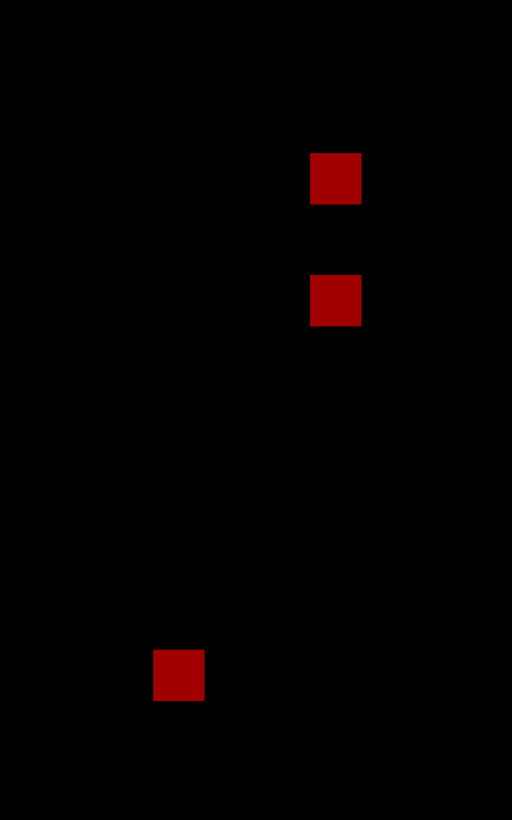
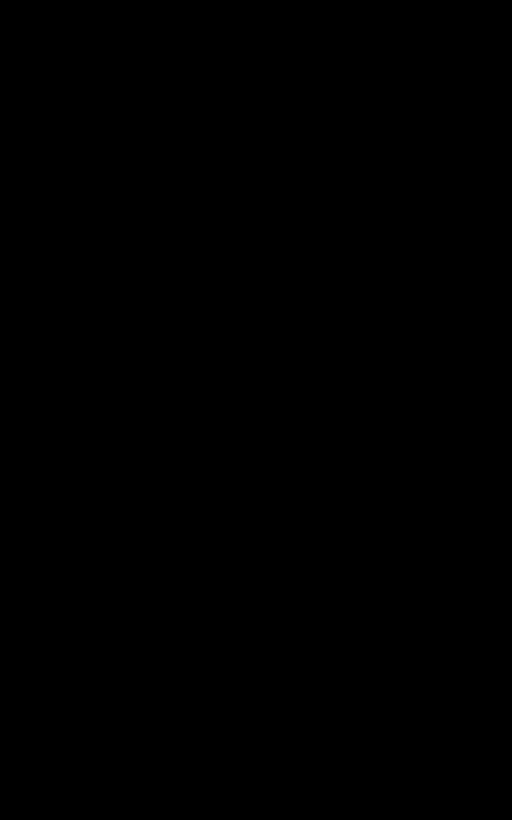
part: (335, 178) -> none
part: (335, 300) -> none
part: (178, 675) -> none

